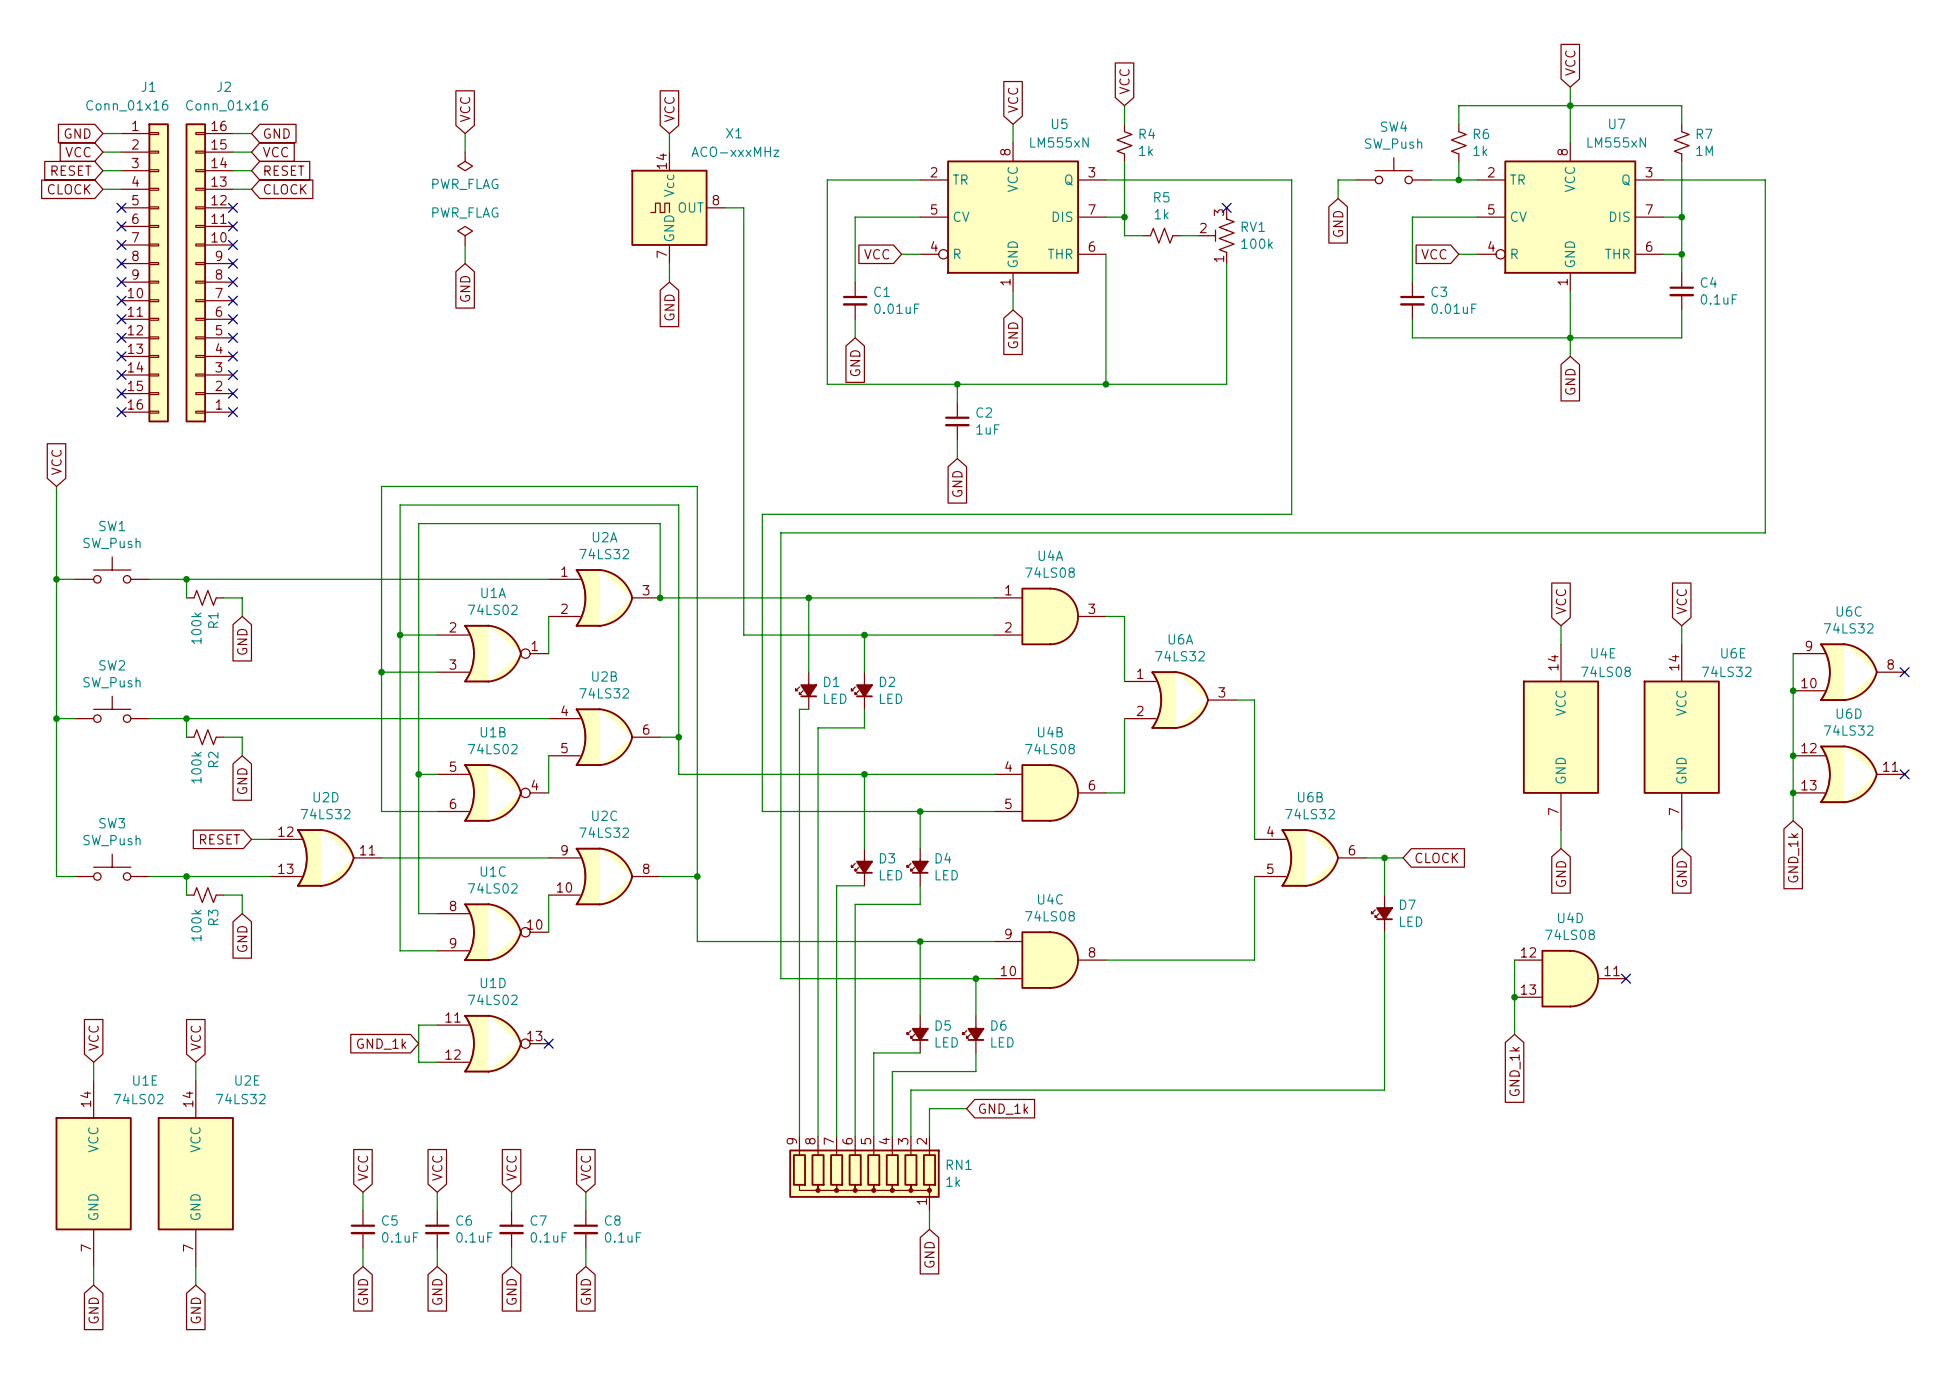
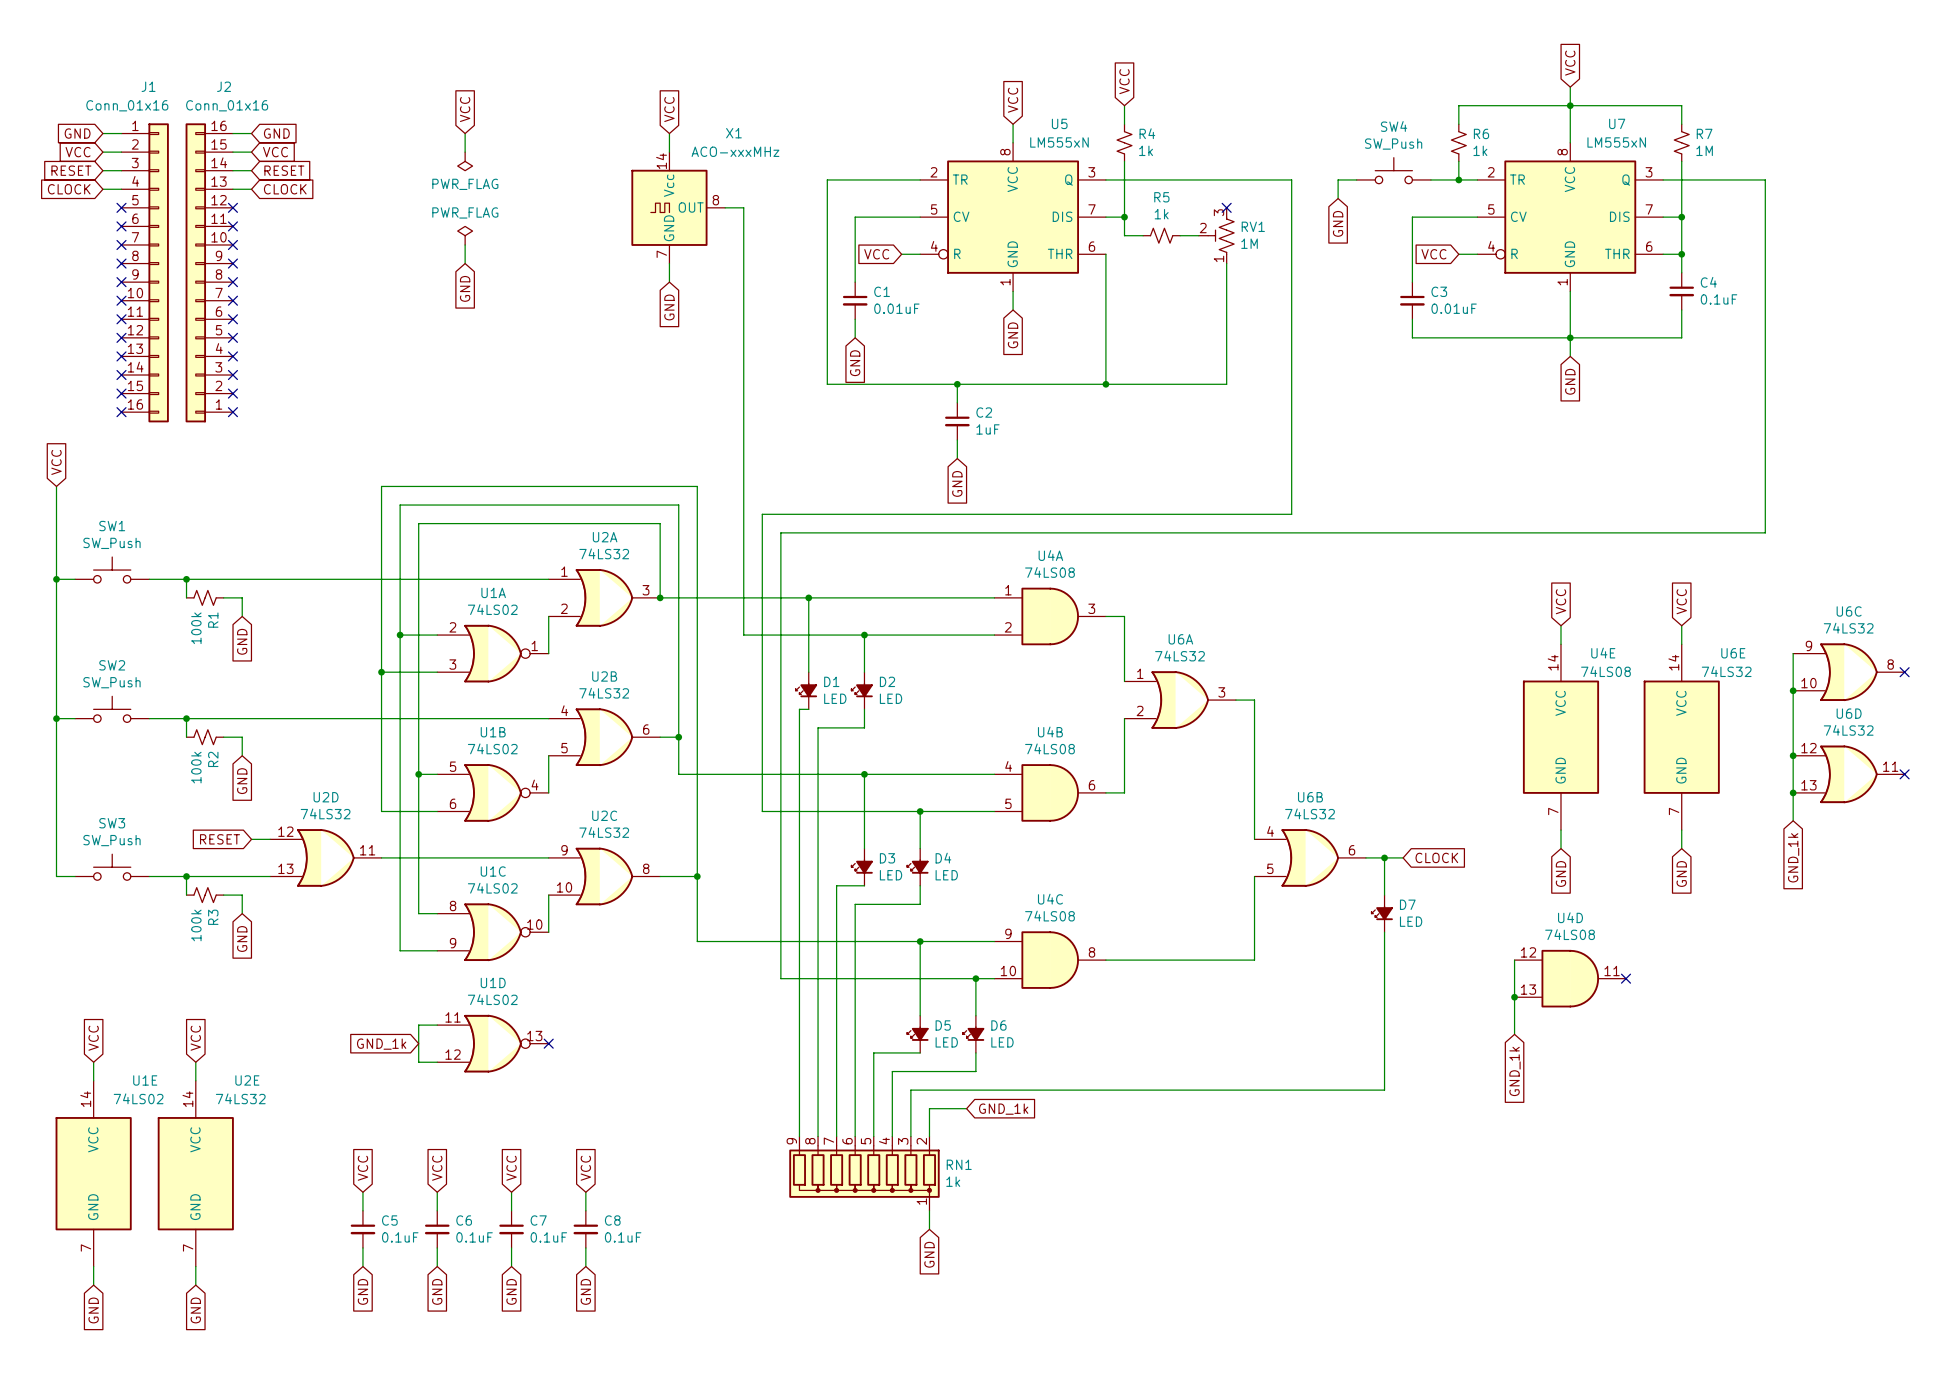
RV1 value: 100k (1257, 243) -> 1M (1249, 243)

